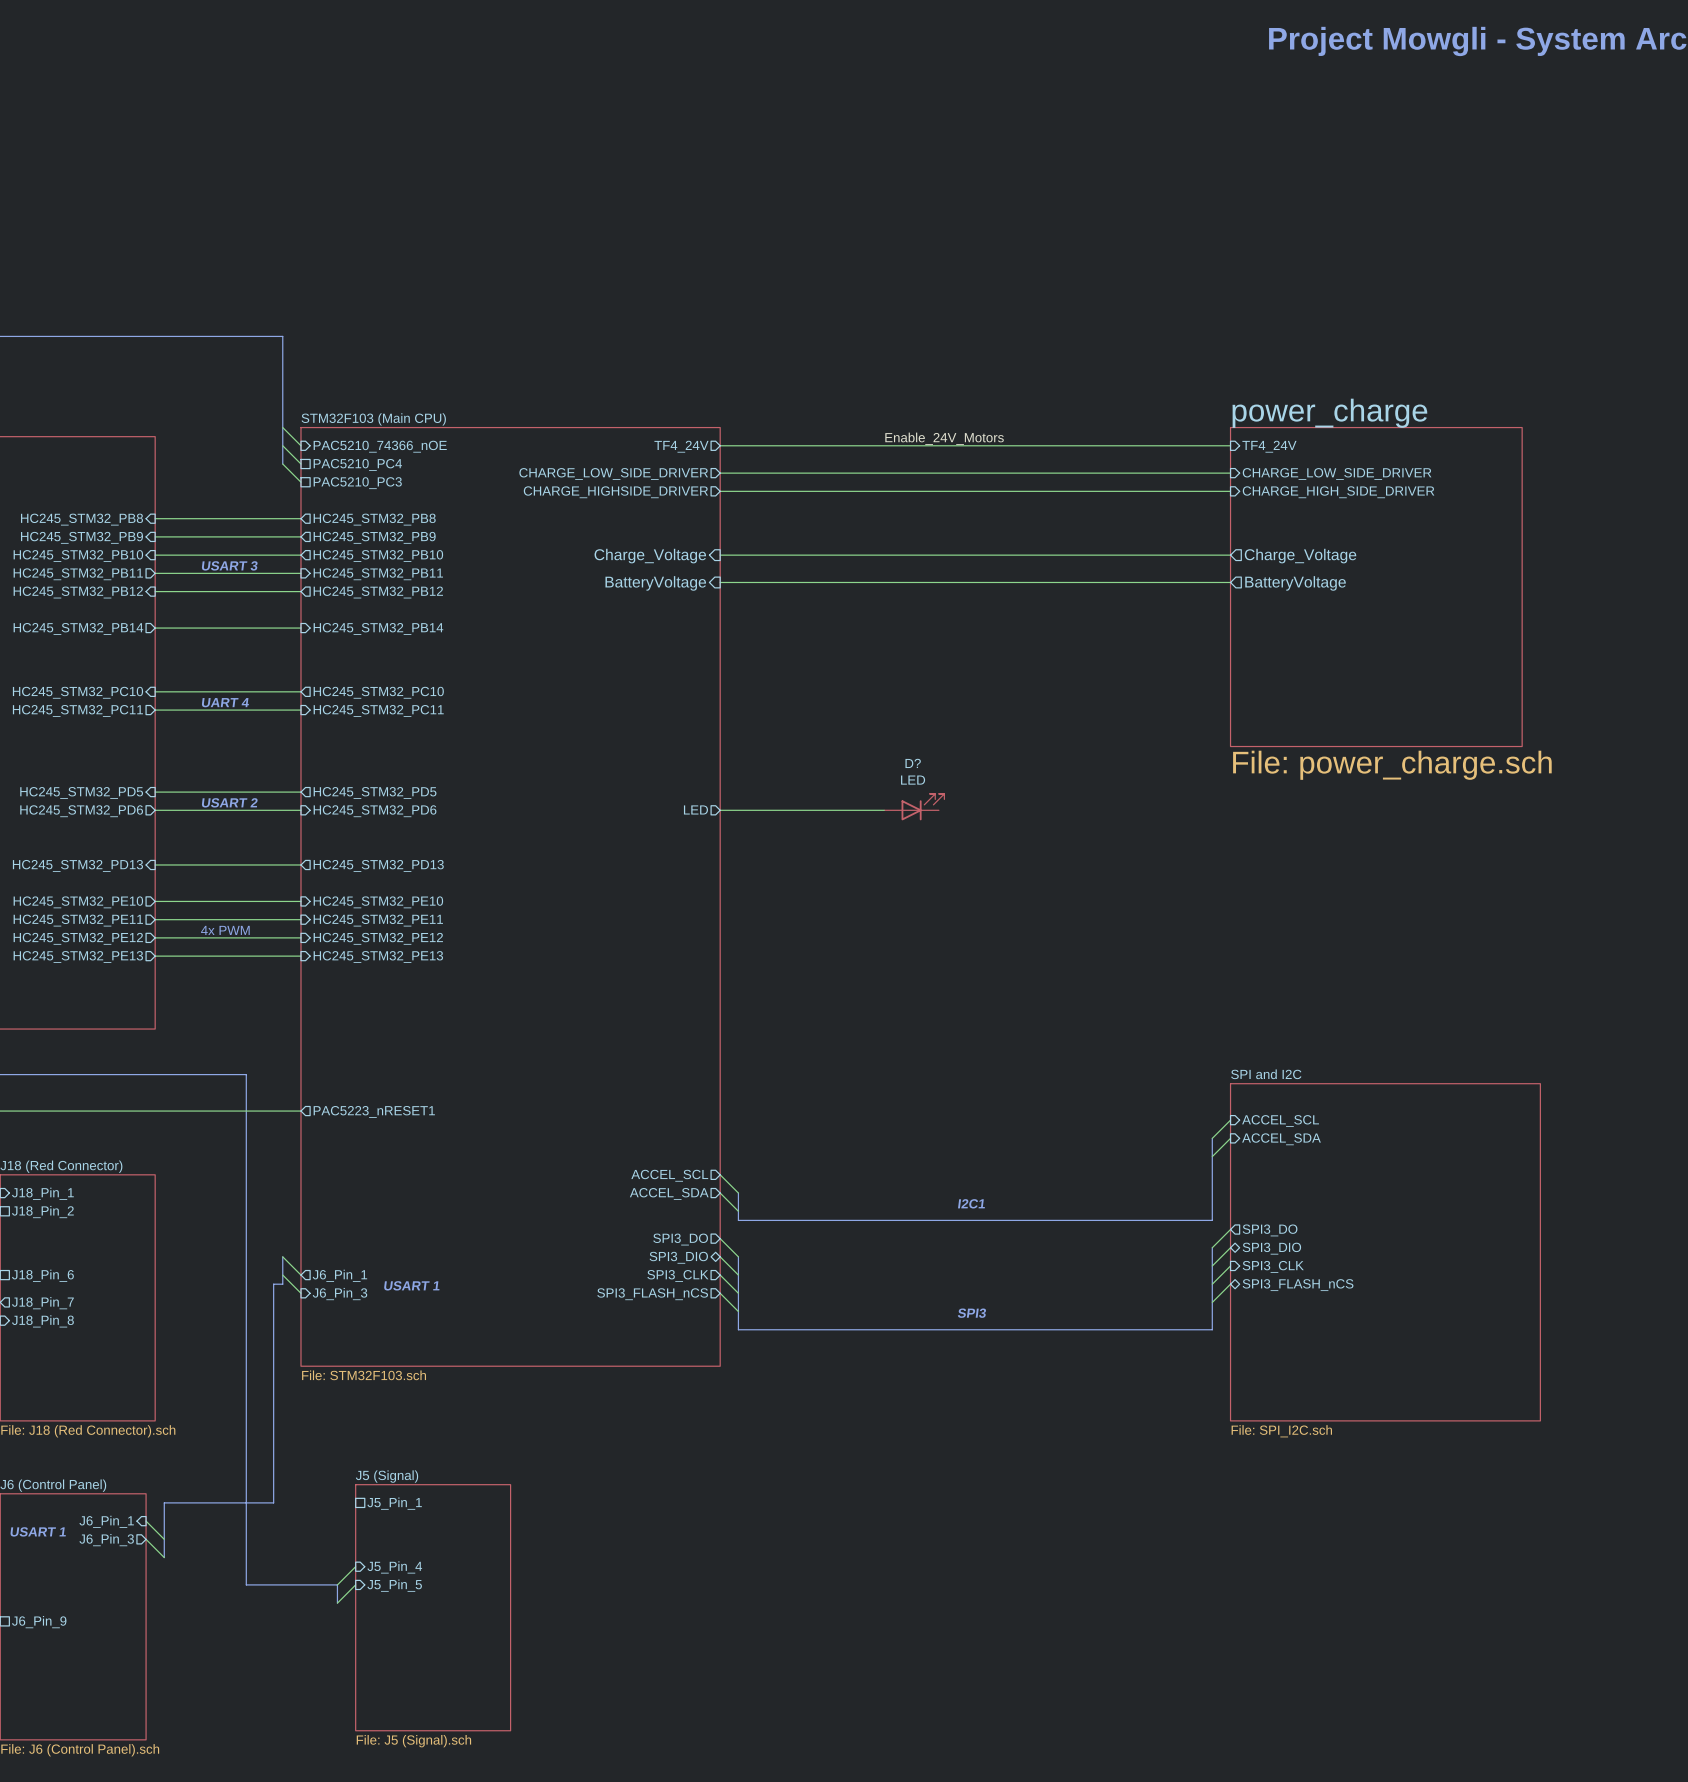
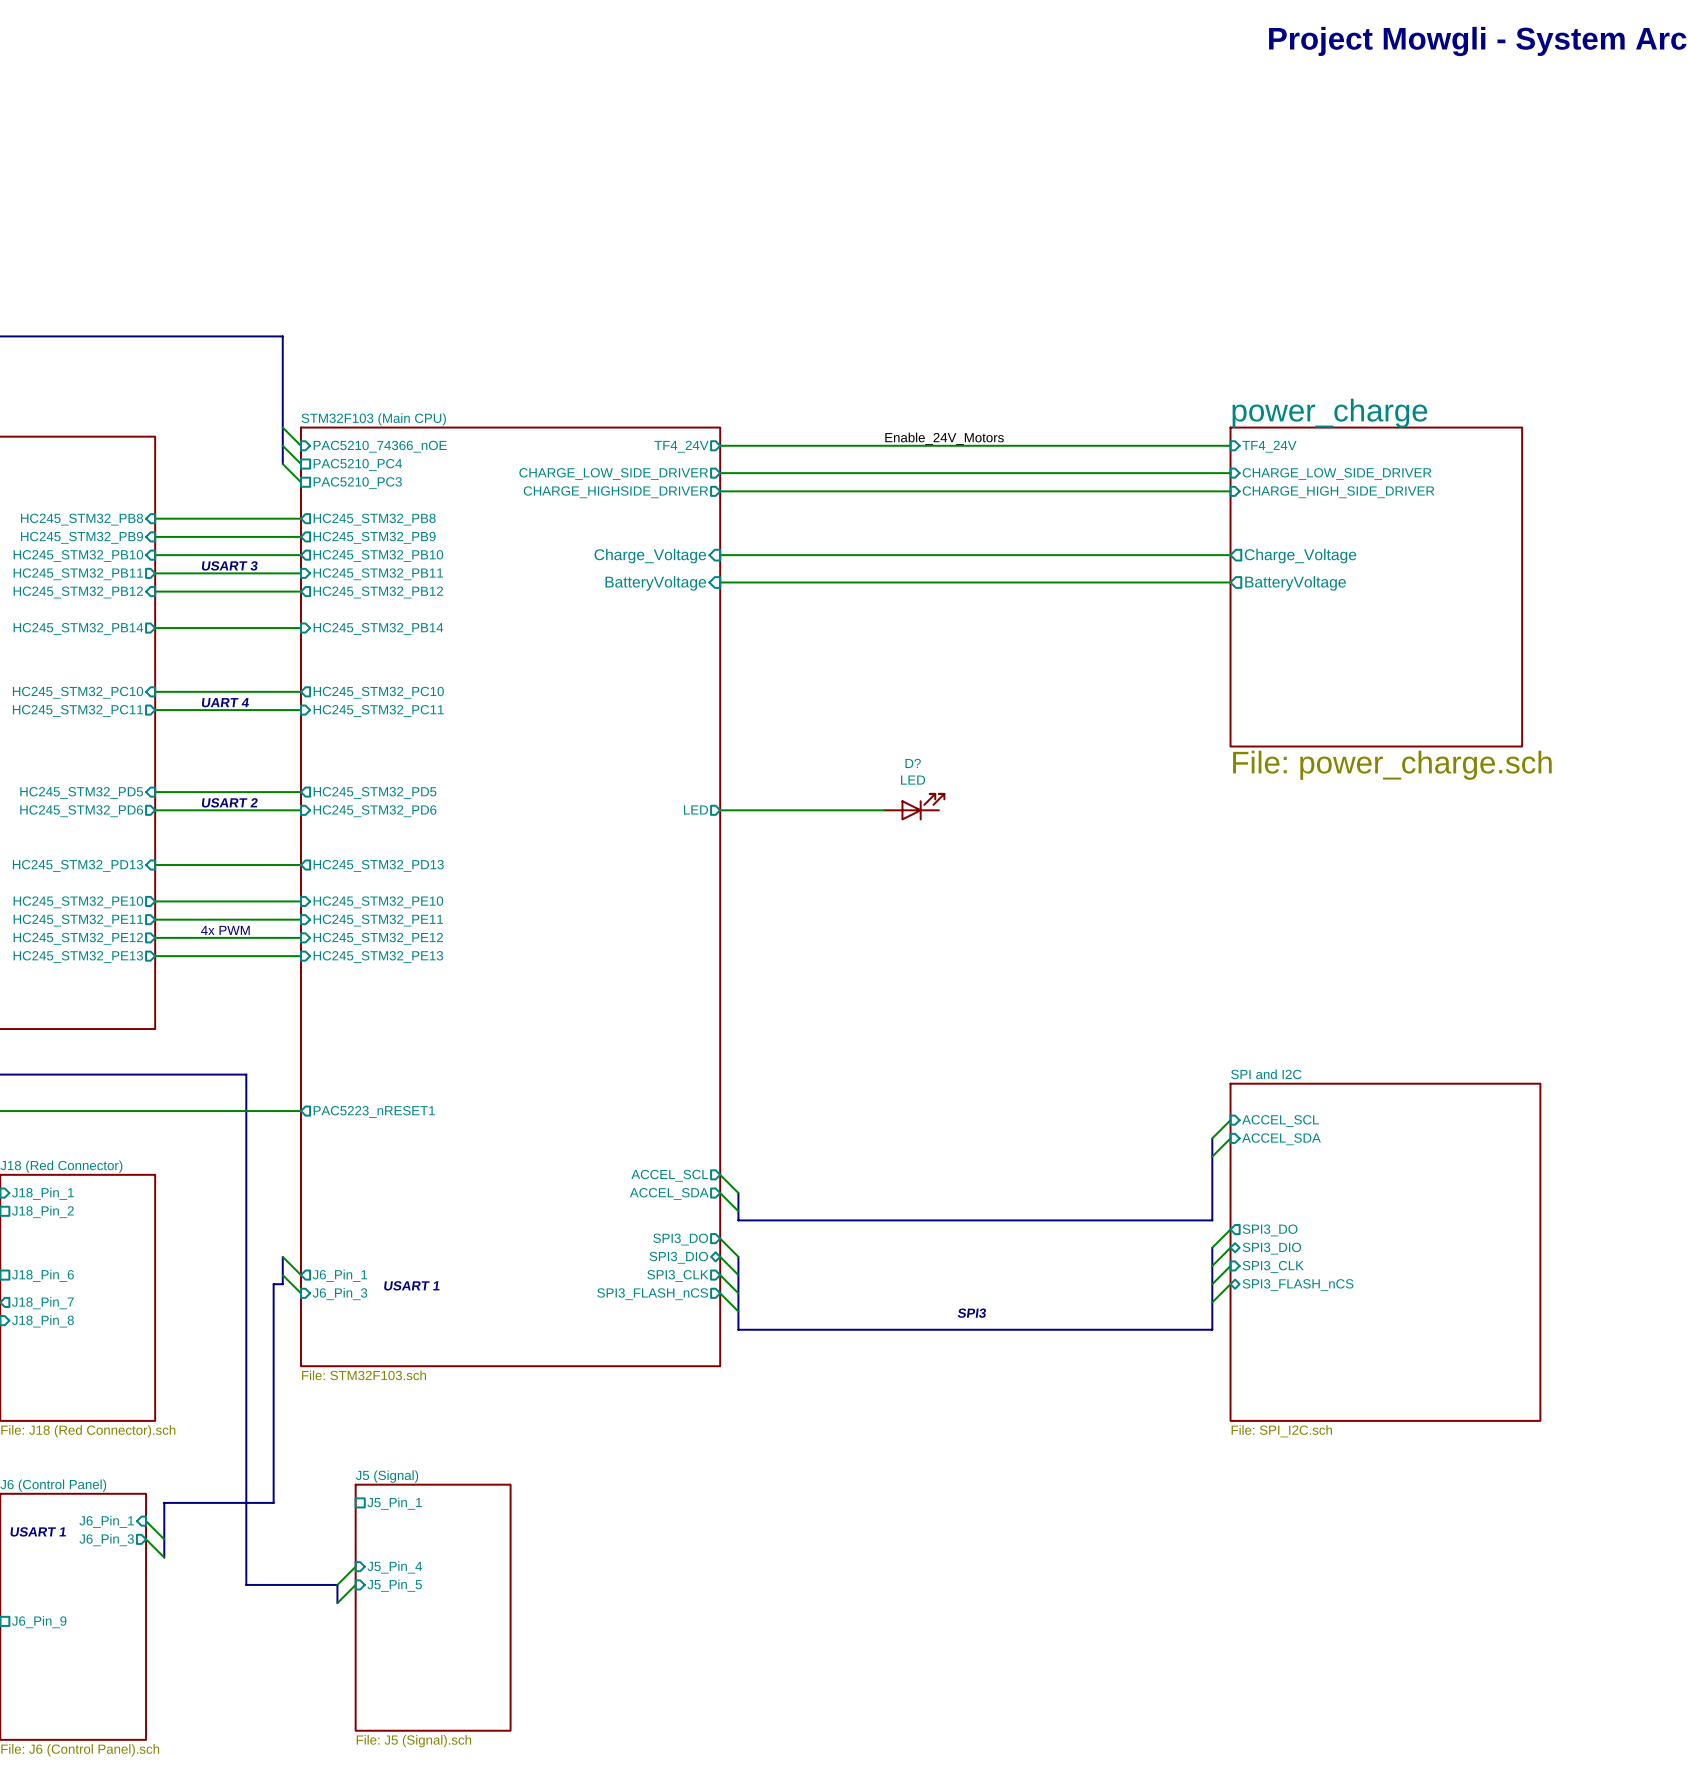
text: I2C1 (971, 1203) -> none

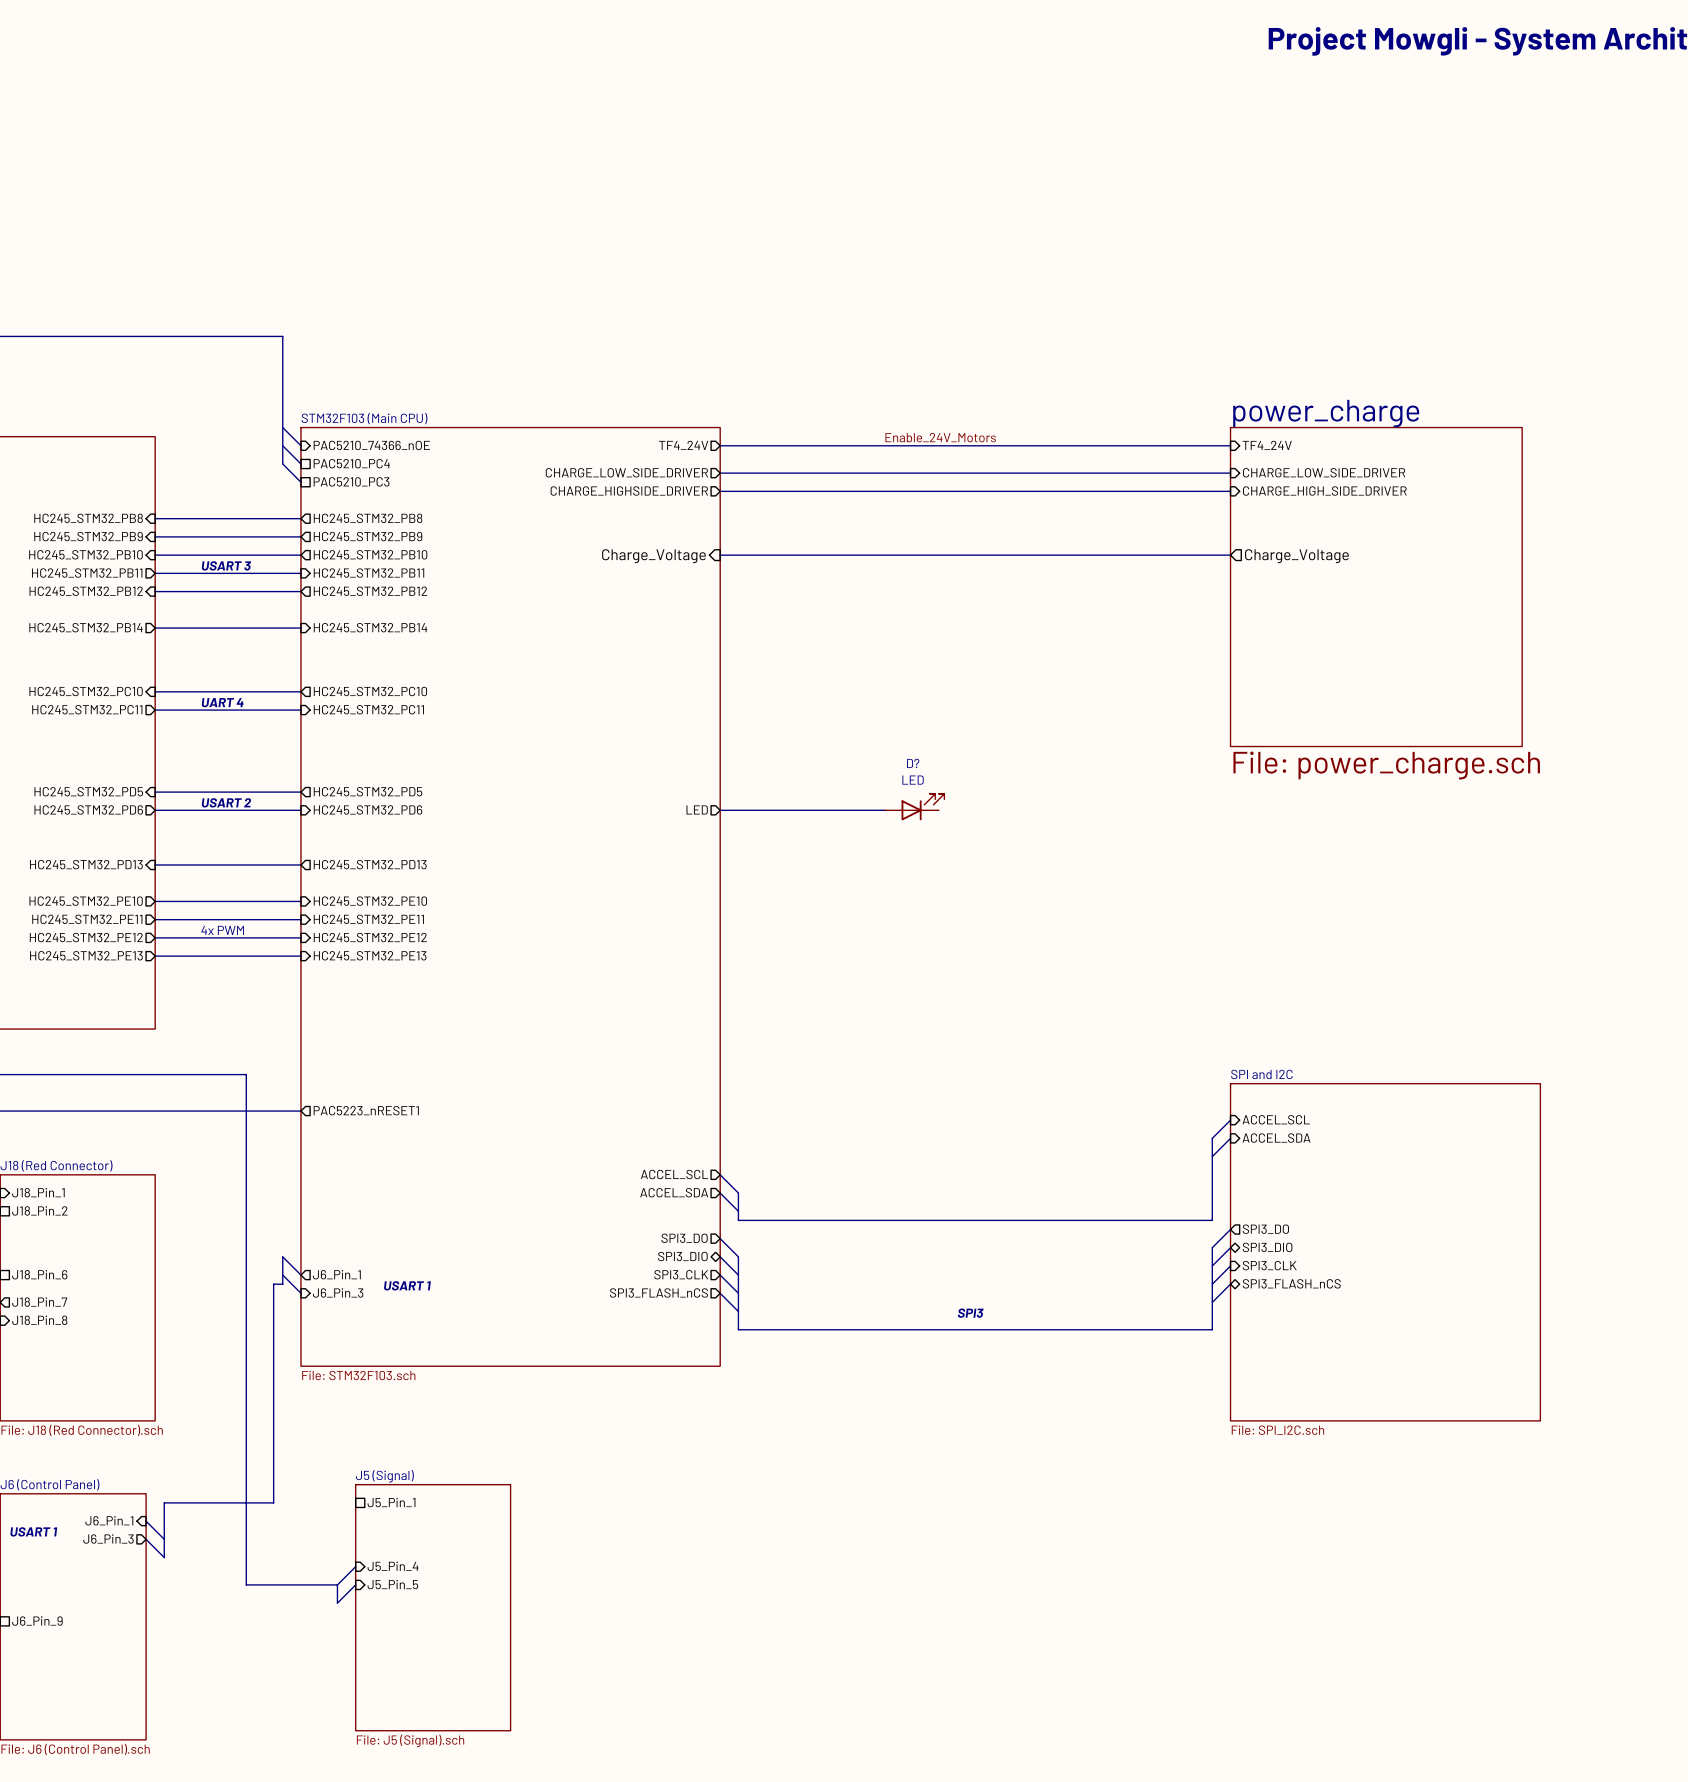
wire: (720, 582) (1230, 582) -> none
sheet pin: BatteryVoltage (655, 583) -> none
sheet pin: BatteryVoltage (1295, 583) -> none

